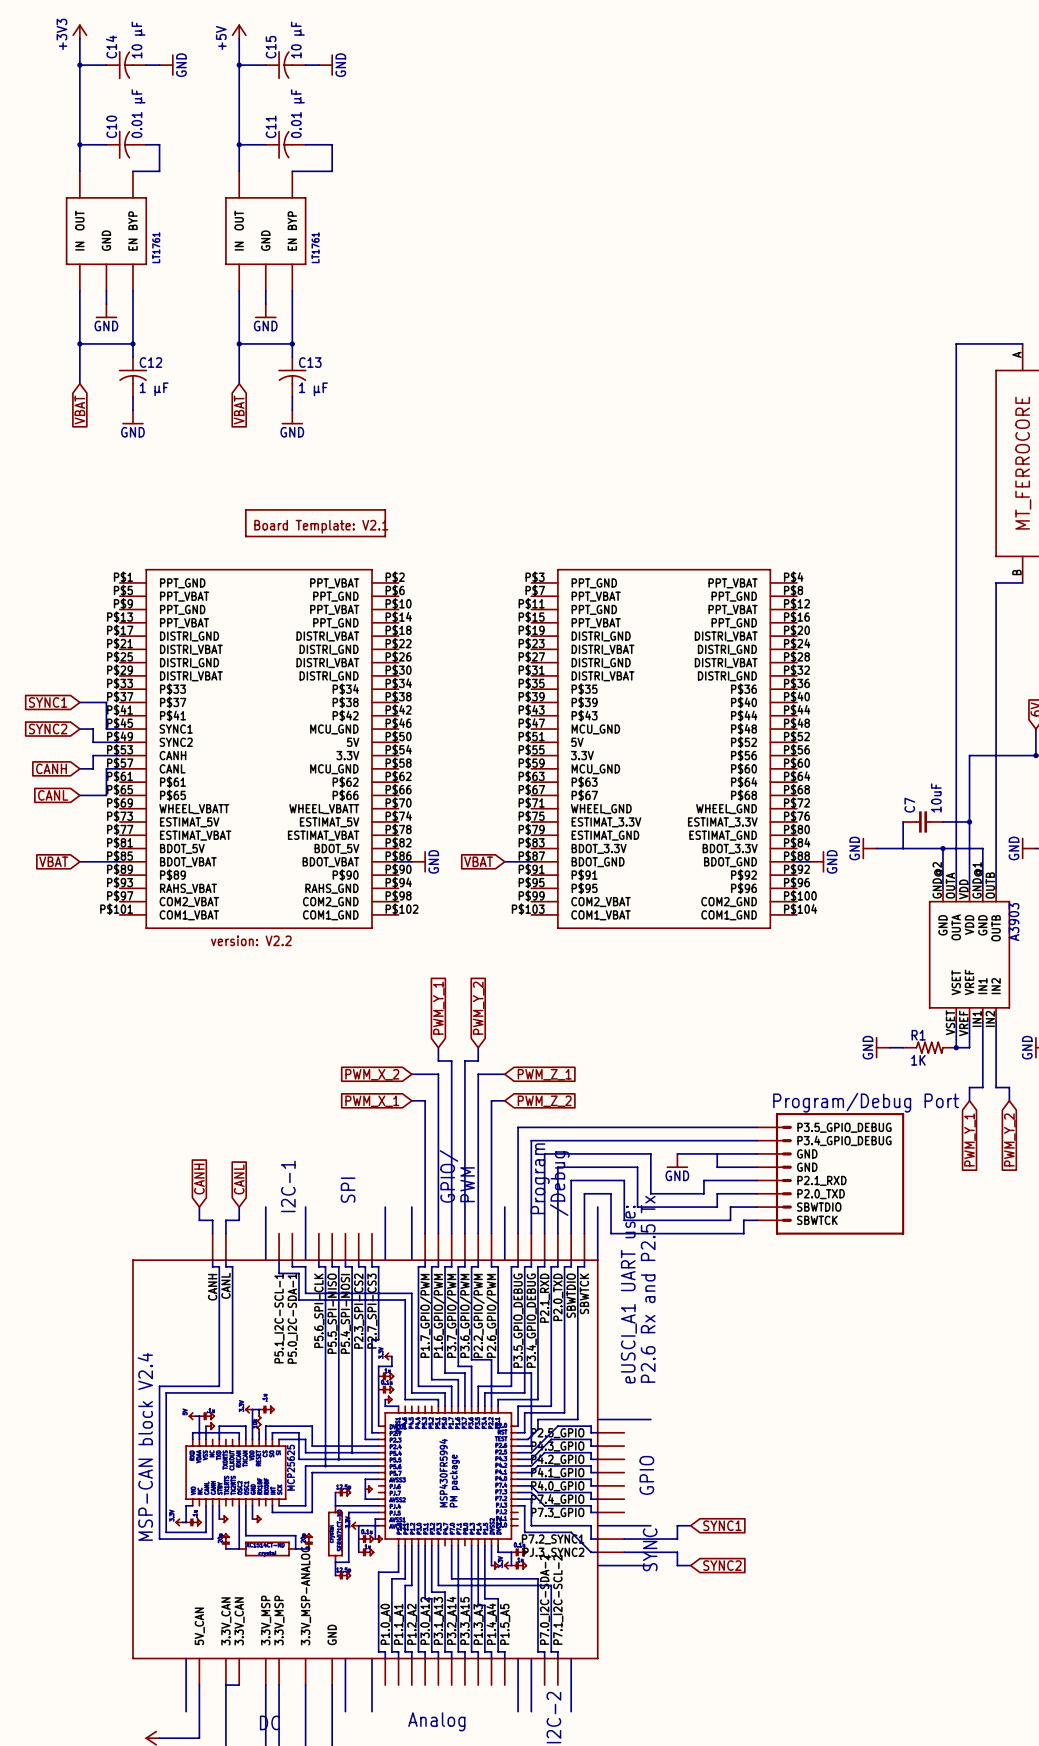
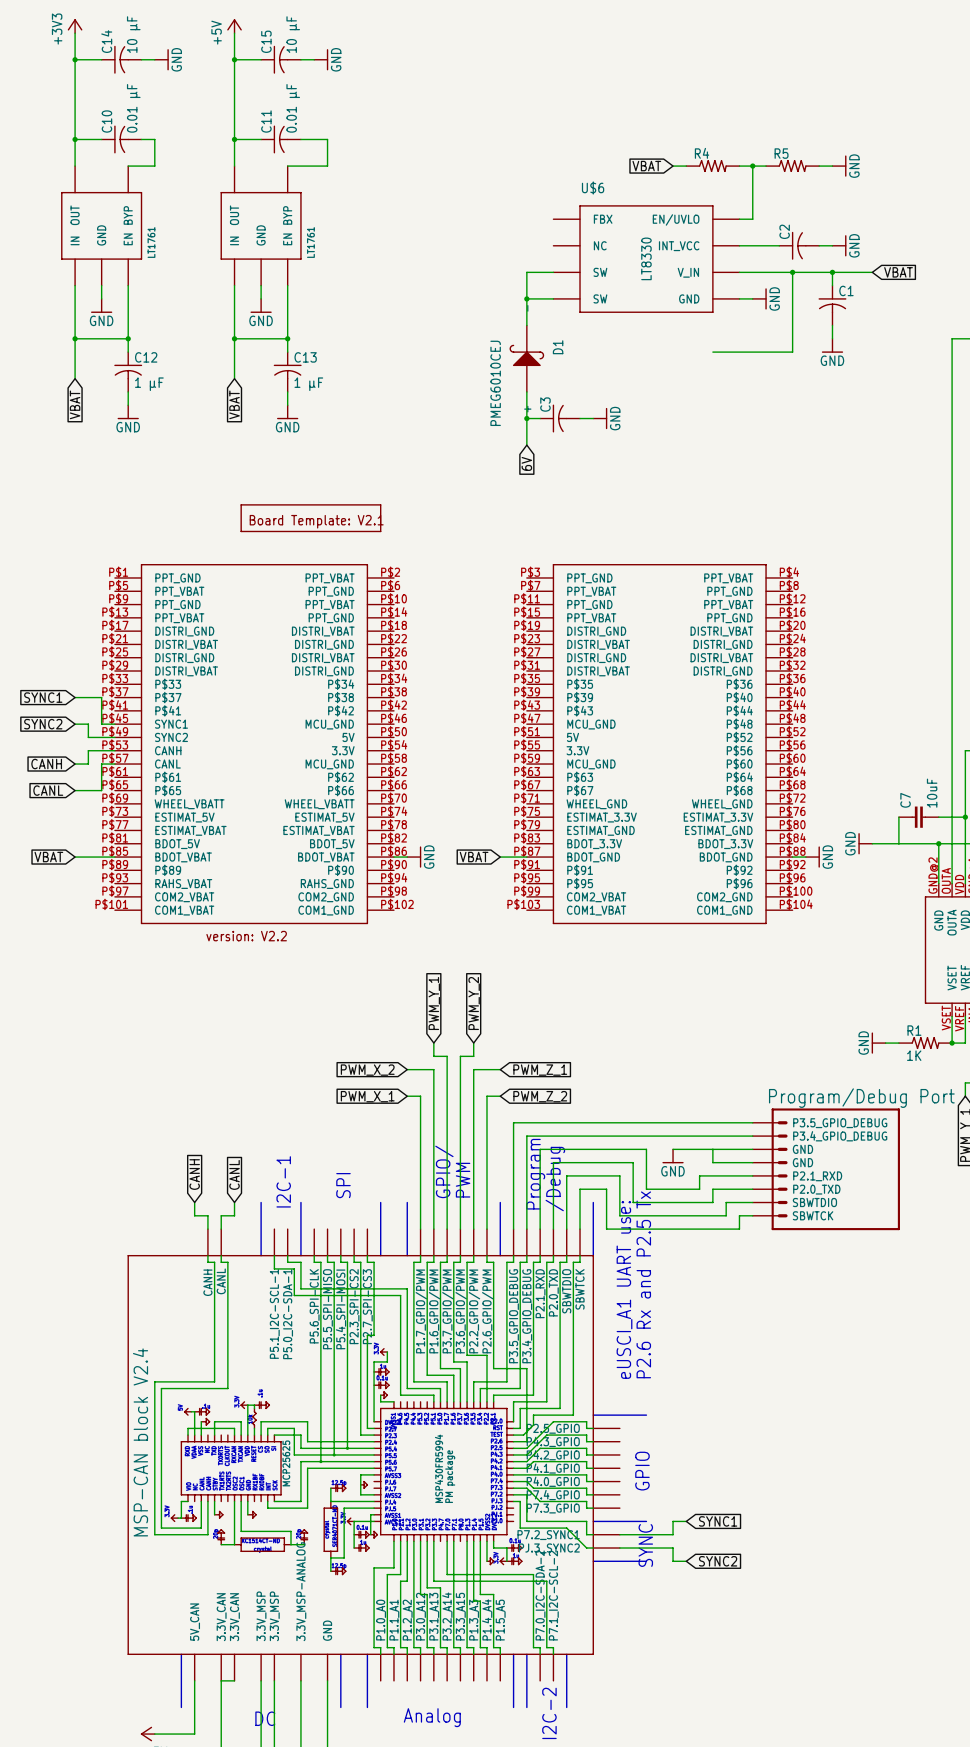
global label: none -> VBAT (646, 166)
wire: none -> (673, 166) (686, 166)
R4: none -> (712, 166)
wire: none -> (739, 166) (766, 166)
wire: none -> (752, 166) (752, 219) (739, 219)
junction: none -> (752, 166)
R5: none -> (792, 166)
wire: none -> (819, 166) (832, 166)
power symbol: none -> GND (839, 166)
wire: none -> (739, 245) (779, 245)
C2: none -> (799, 245)
wire: none -> (819, 245) (832, 245)
power symbol: none -> GND (839, 245)
U$6: none -> LT8330 (646, 259)
wire: none -> (553, 272) (526, 272) (526, 325)
wire: none -> (739, 272) (872, 272)
wire: none -> (792, 272) (792, 352) (712, 352)
junction: none -> (792, 272)
wire: none -> (832, 272) (832, 285)
junction: none -> (832, 272)
global label: none -> VBAT (898, 272)
wire: none -> (526, 298) (553, 298)
junction: none -> (526, 298)
wire: none -> (739, 298) (752, 298)
power symbol: none -> GND (759, 298)
C1: none -> (832, 305)
wire: none -> (832, 325) (832, 338)
power symbol: none -> GND (832, 345)
D1: none -> PMEG6010CEJ (526, 358)
wire: none -> (526, 391) (526, 445)
wire: none -> (526, 418) (540, 418)
junction: none -> (526, 418)
C3: none -> (560, 418)
wire: none -> (580, 418) (593, 418)
power symbol: none -> GND (600, 418)
global label: none -> 6V (526, 463)

